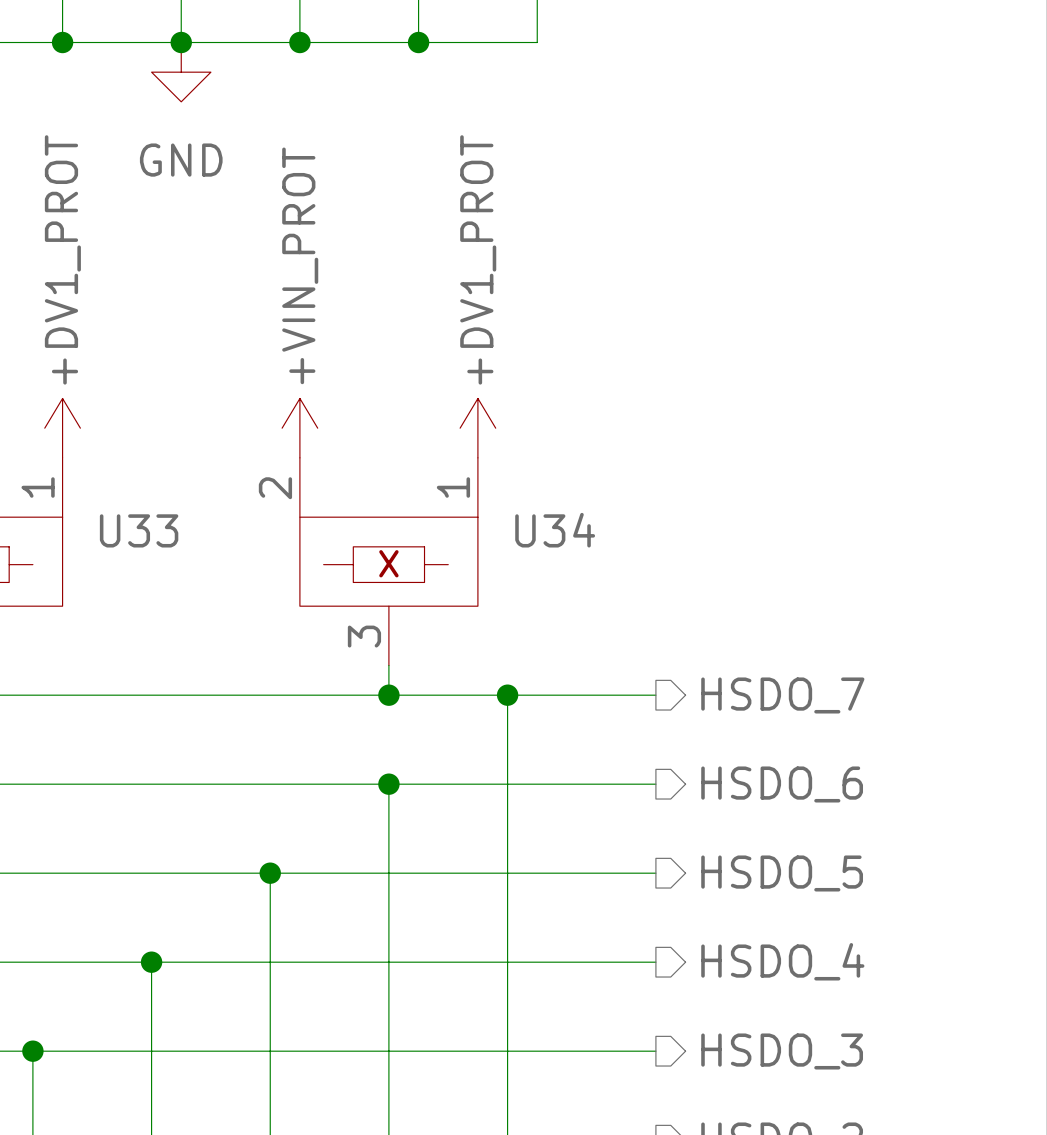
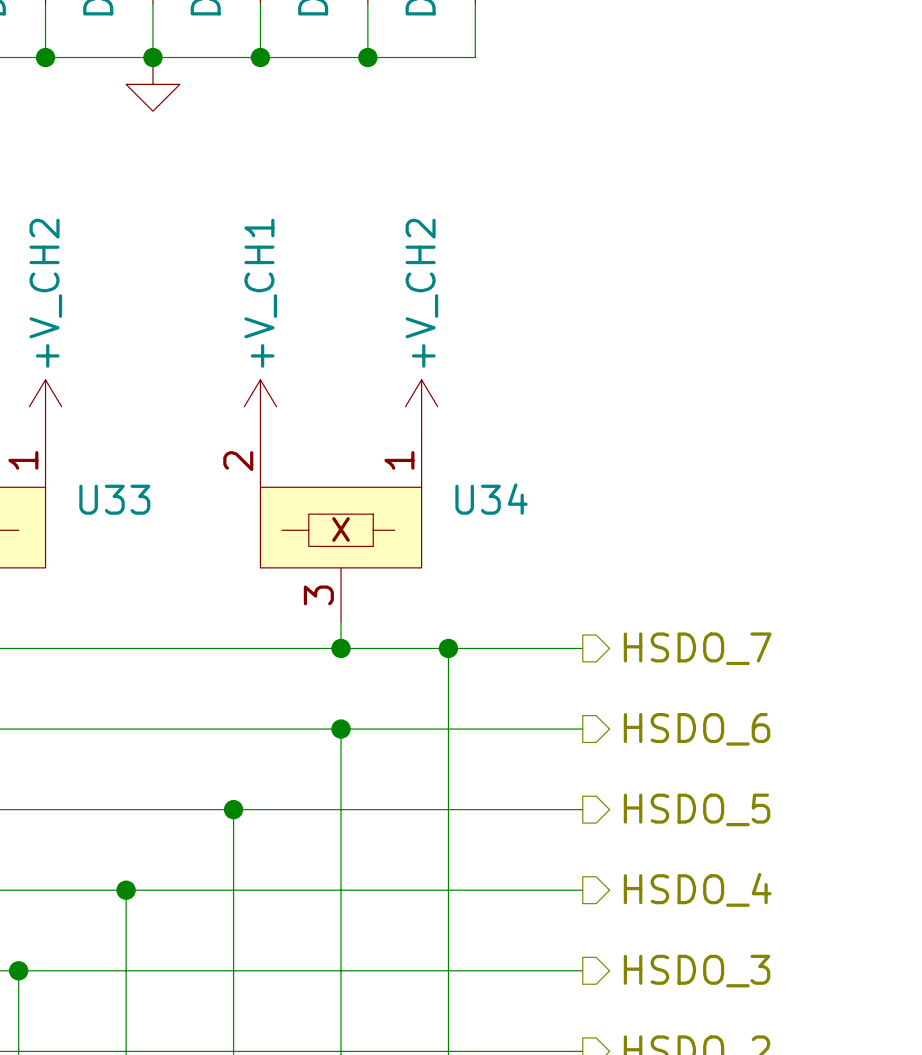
power symbol text: GND (181, 160) -> none
power symbol: +DV1_PROT (62, 428) -> +V_CH2 (45, 406)
power symbol: +VIN_PROT (299, 428) -> +V_CH1 (260, 406)
power symbol: +DV1_PROT (477, 428) -> +V_CH2 (421, 406)

